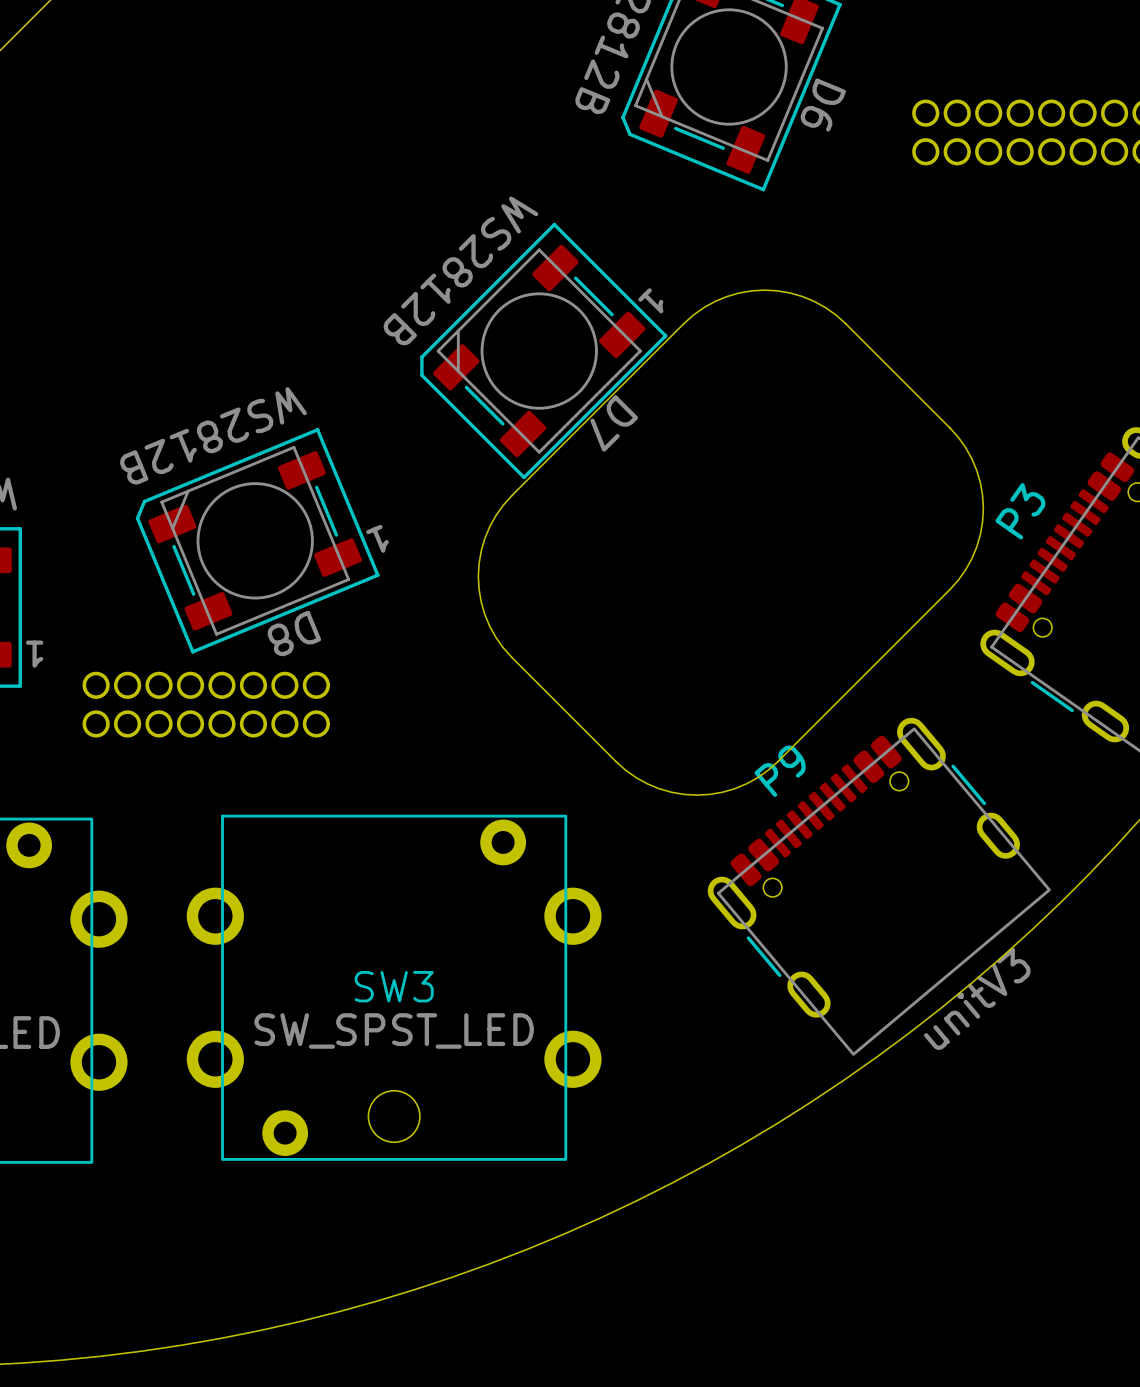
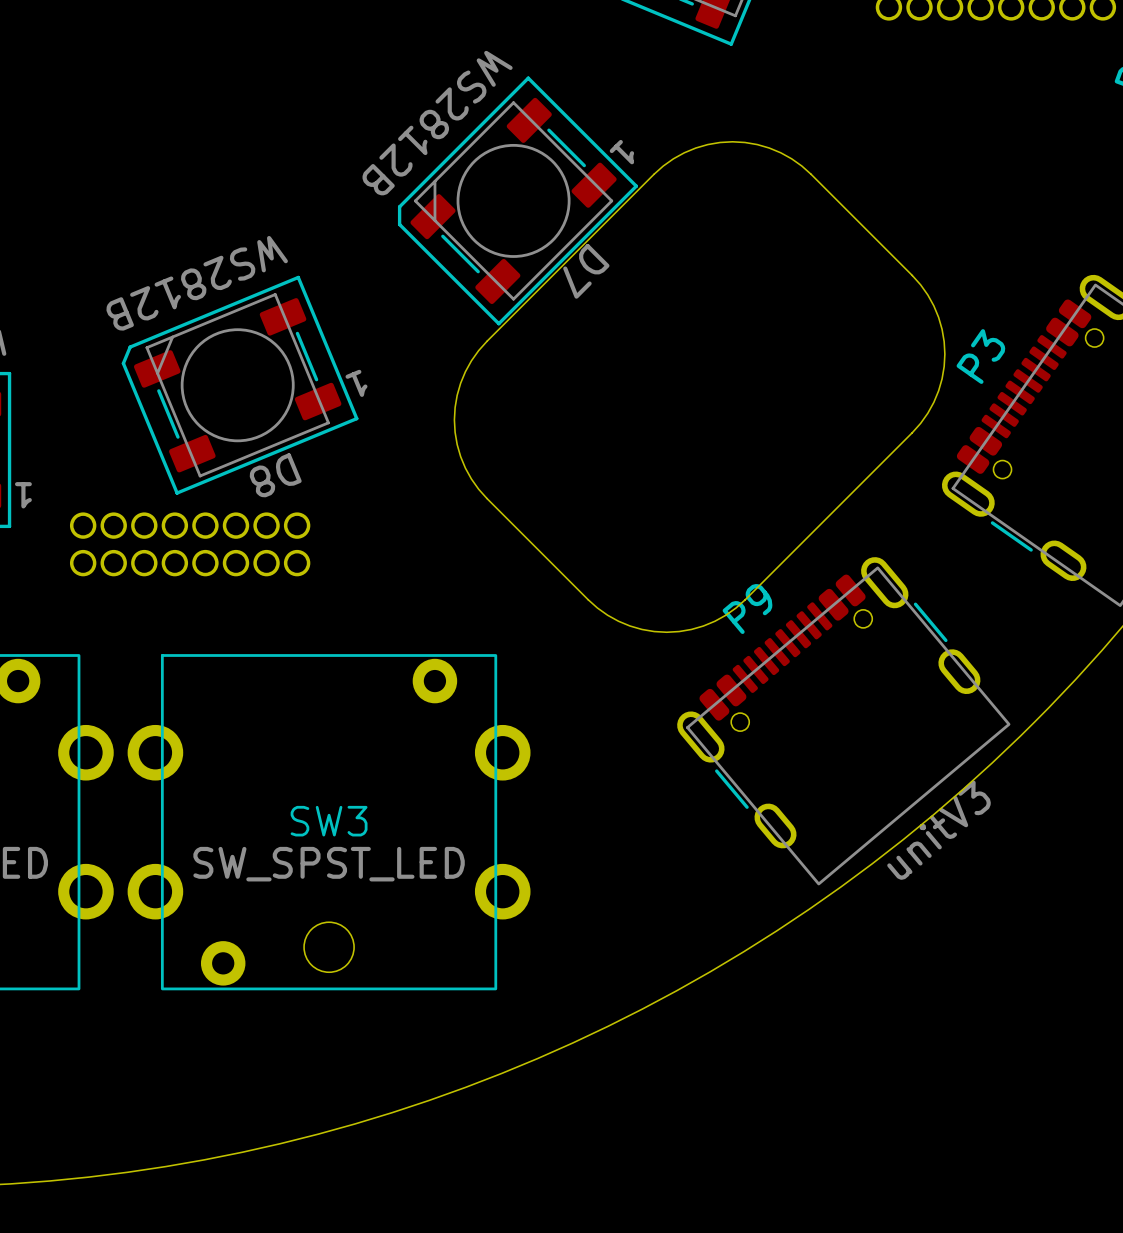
SW3 position: (394, 987) -> (329, 822)

